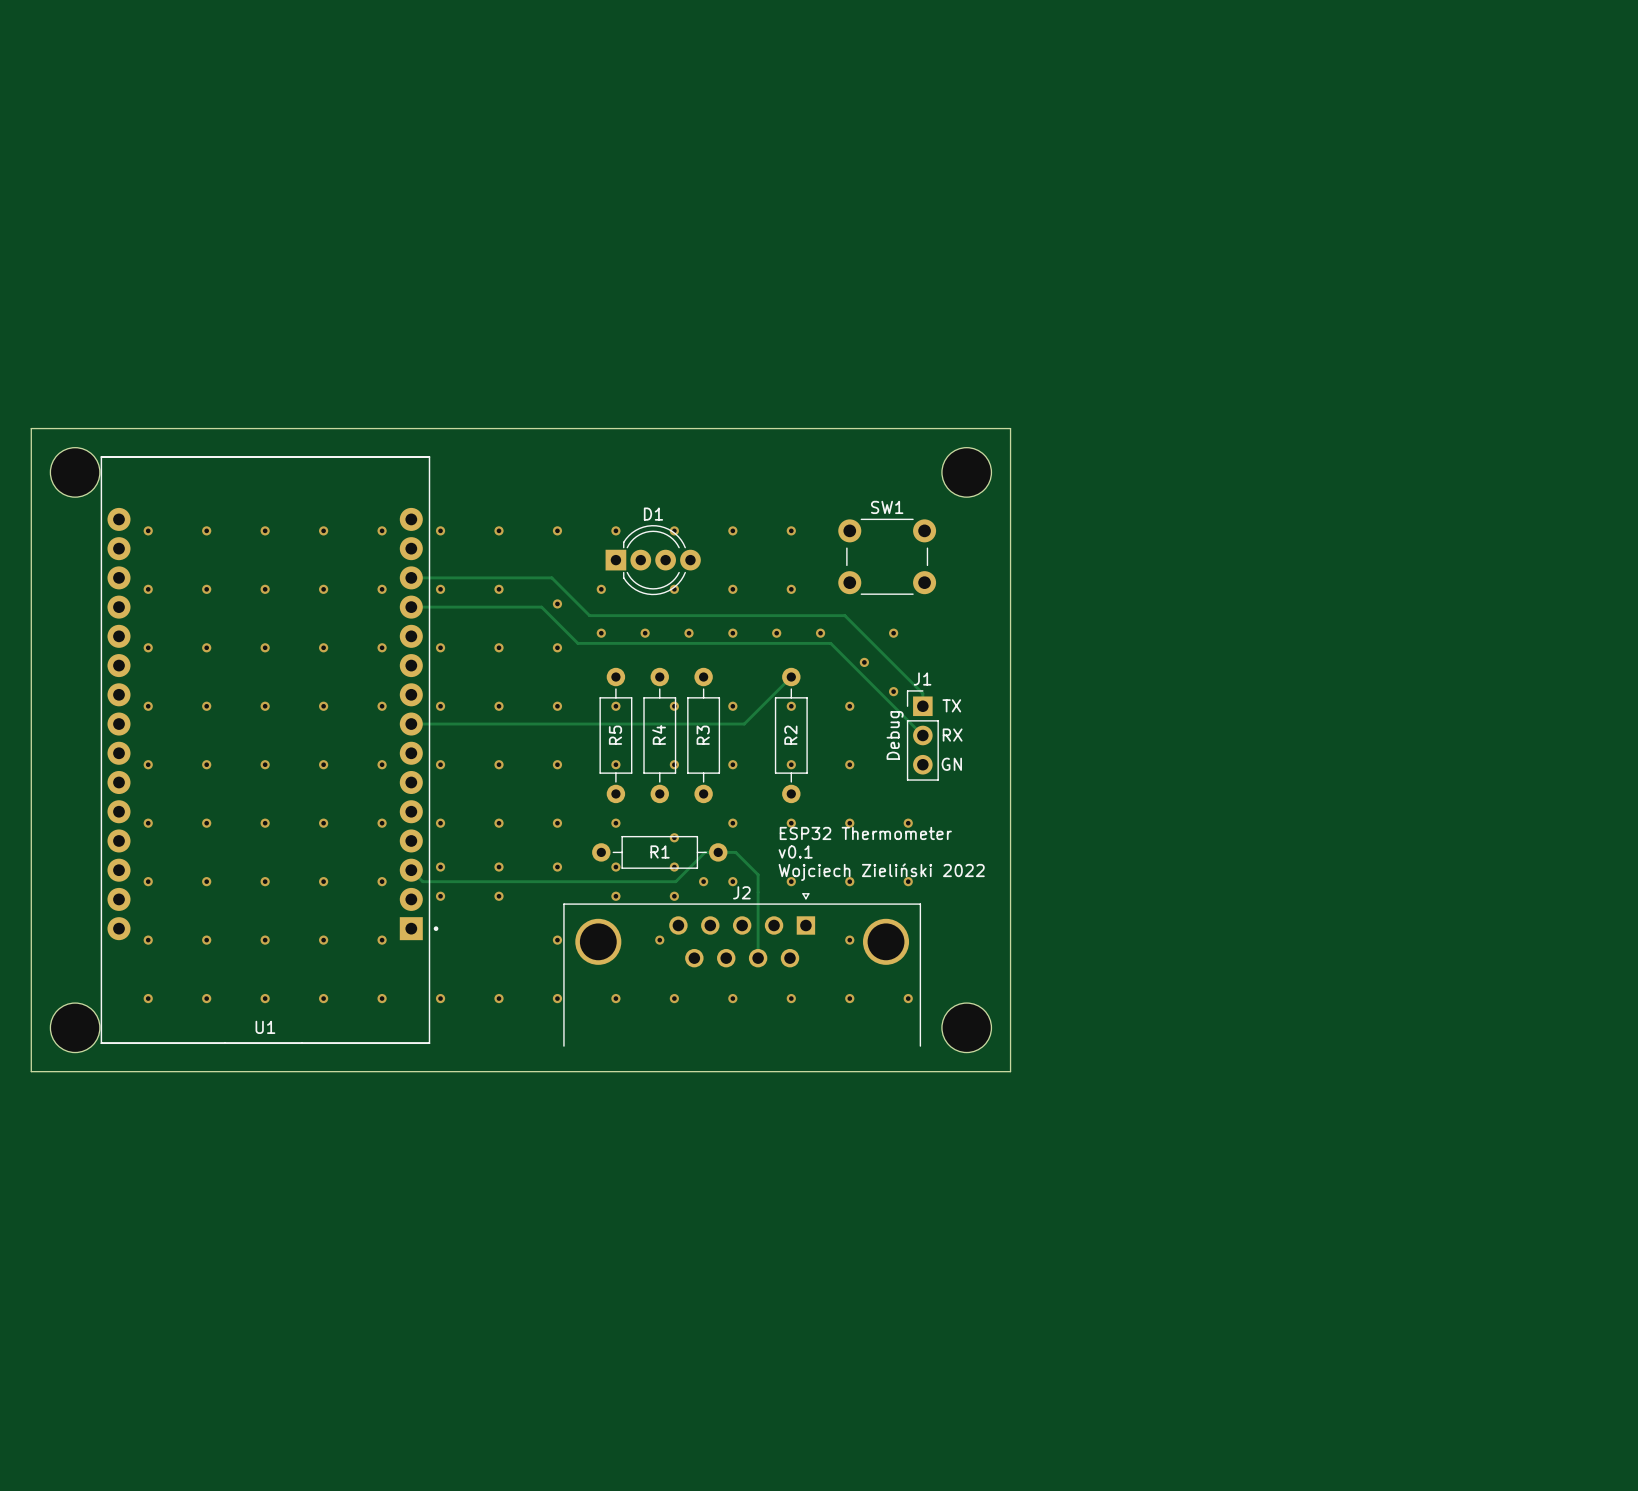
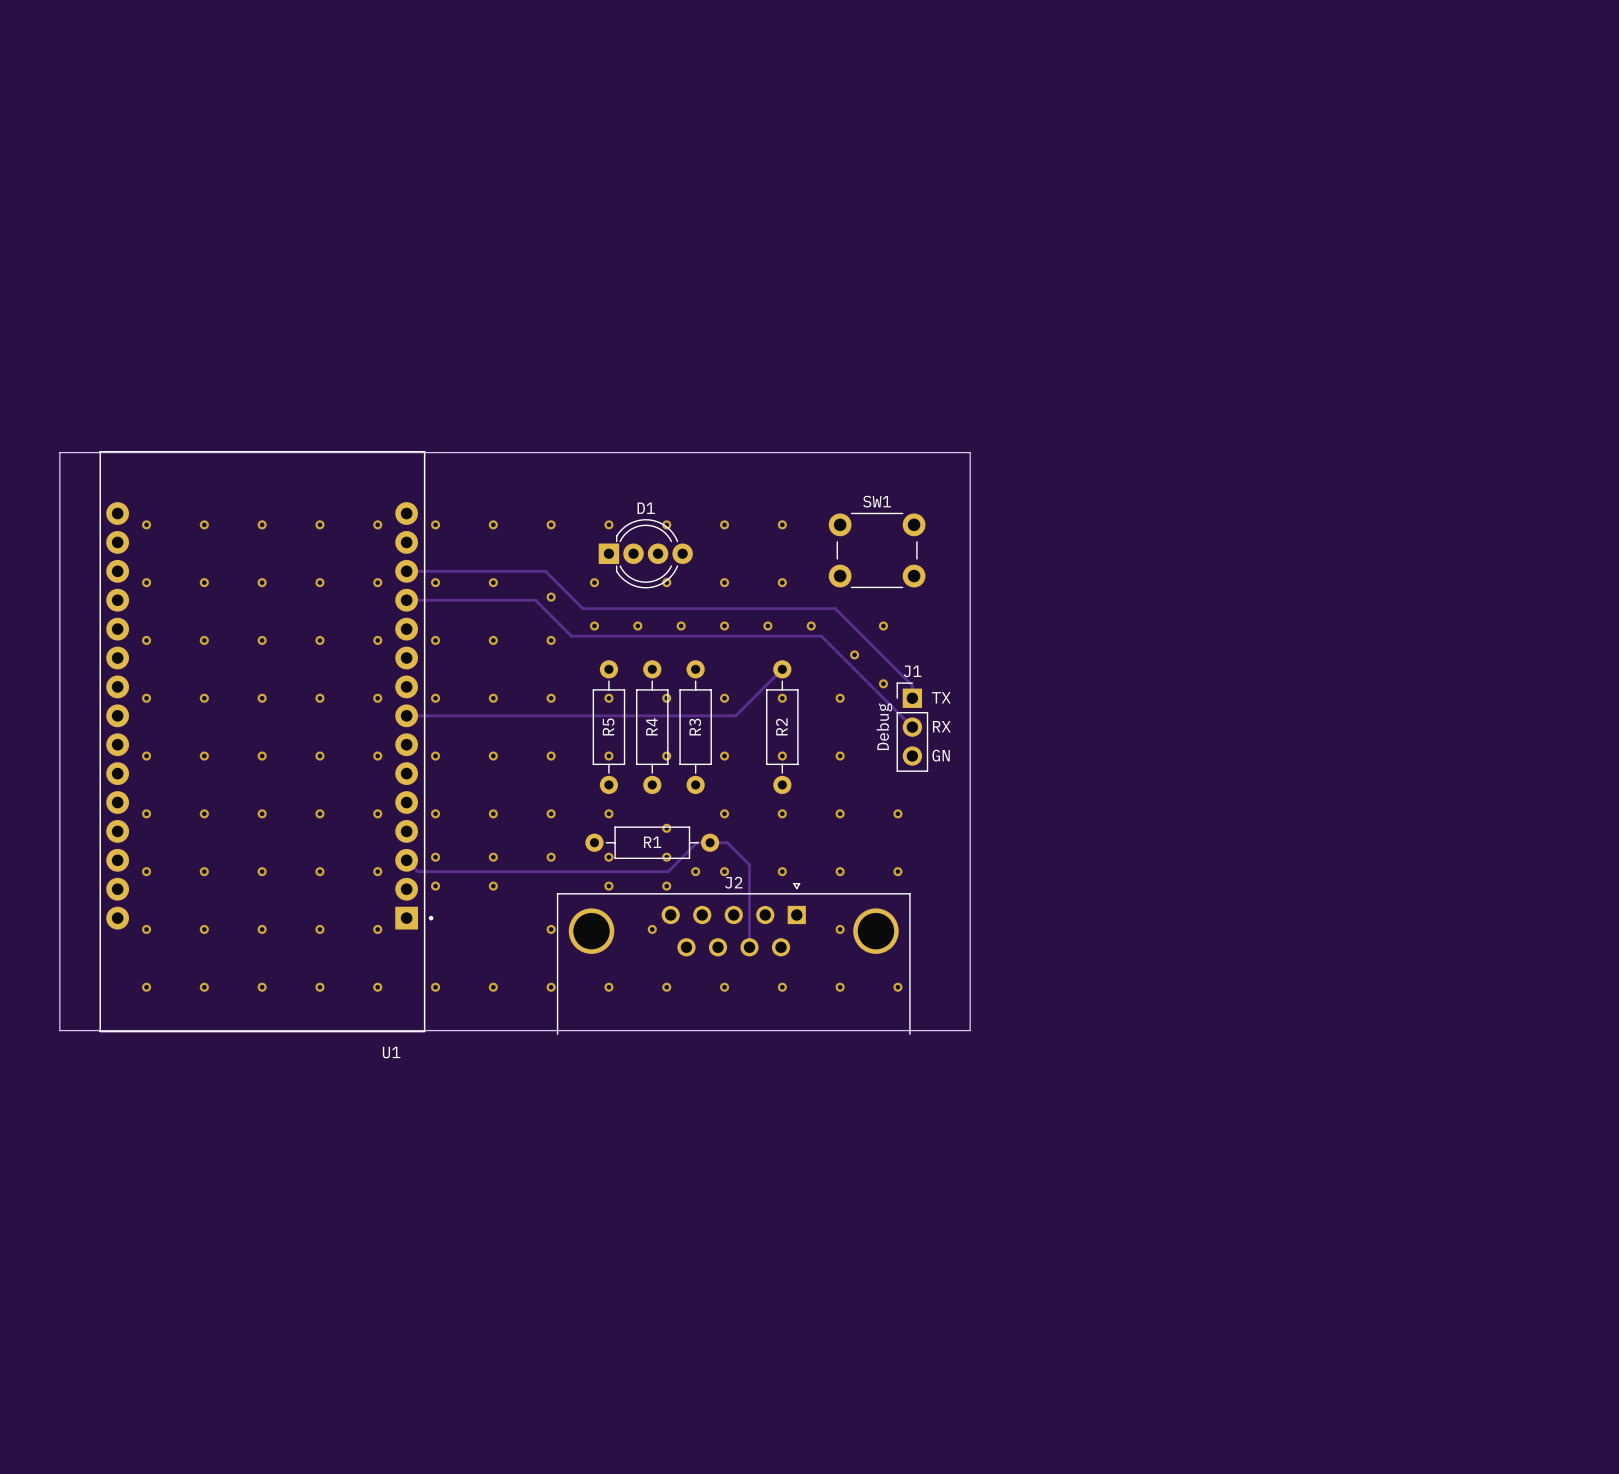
board edge: (31, 428) (31, 1071) (1010, 1071) (1010, 428) (31, 428) -> (59, 452) (59, 1030) (970, 1030) (970, 452) (59, 452)
part: (75, 472) -> none
part: (966, 472) -> none
text: ESP32 Thermometer (865, 833) -> none
text: v0.1 (795, 851) -> none
text: Wojciech Zieliński 2022 (881, 872) -> none
part: (75, 1027) -> none
U1 name position: U1 (265, 1027) -> U1 (391, 1052)
part: (966, 1027) -> none

